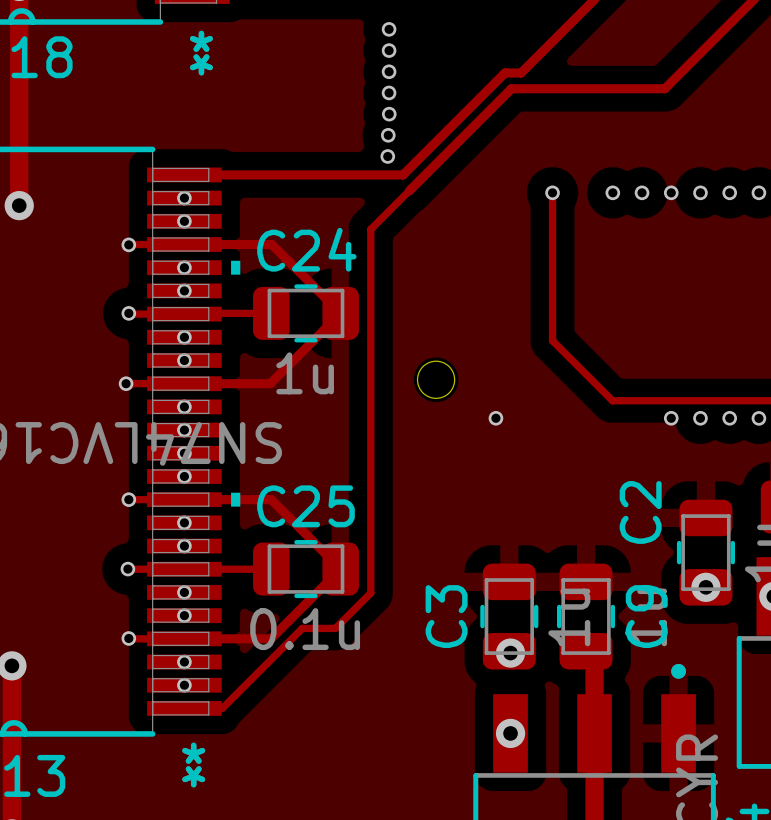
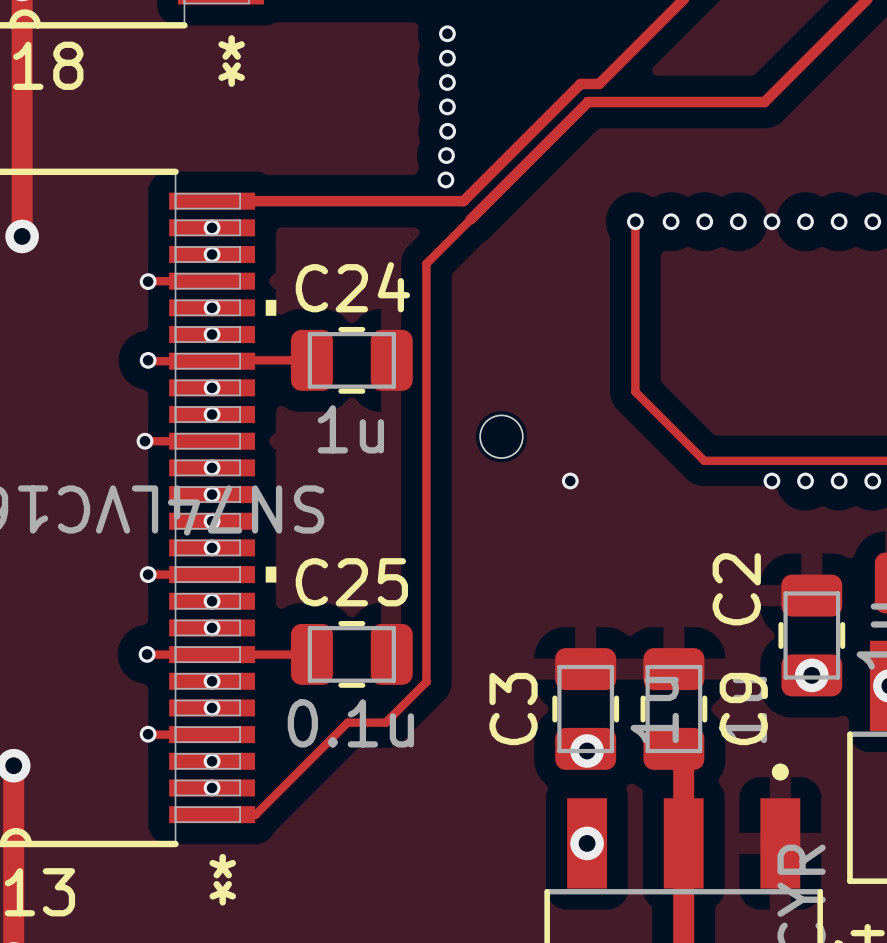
via: none -> (671, 221)
track: (184, 244) (271, 244) (340, 313) (270, 383) (184, 383) -> none
track: (184, 499) (271, 499) (340, 569) (270, 638) (184, 638) -> none

